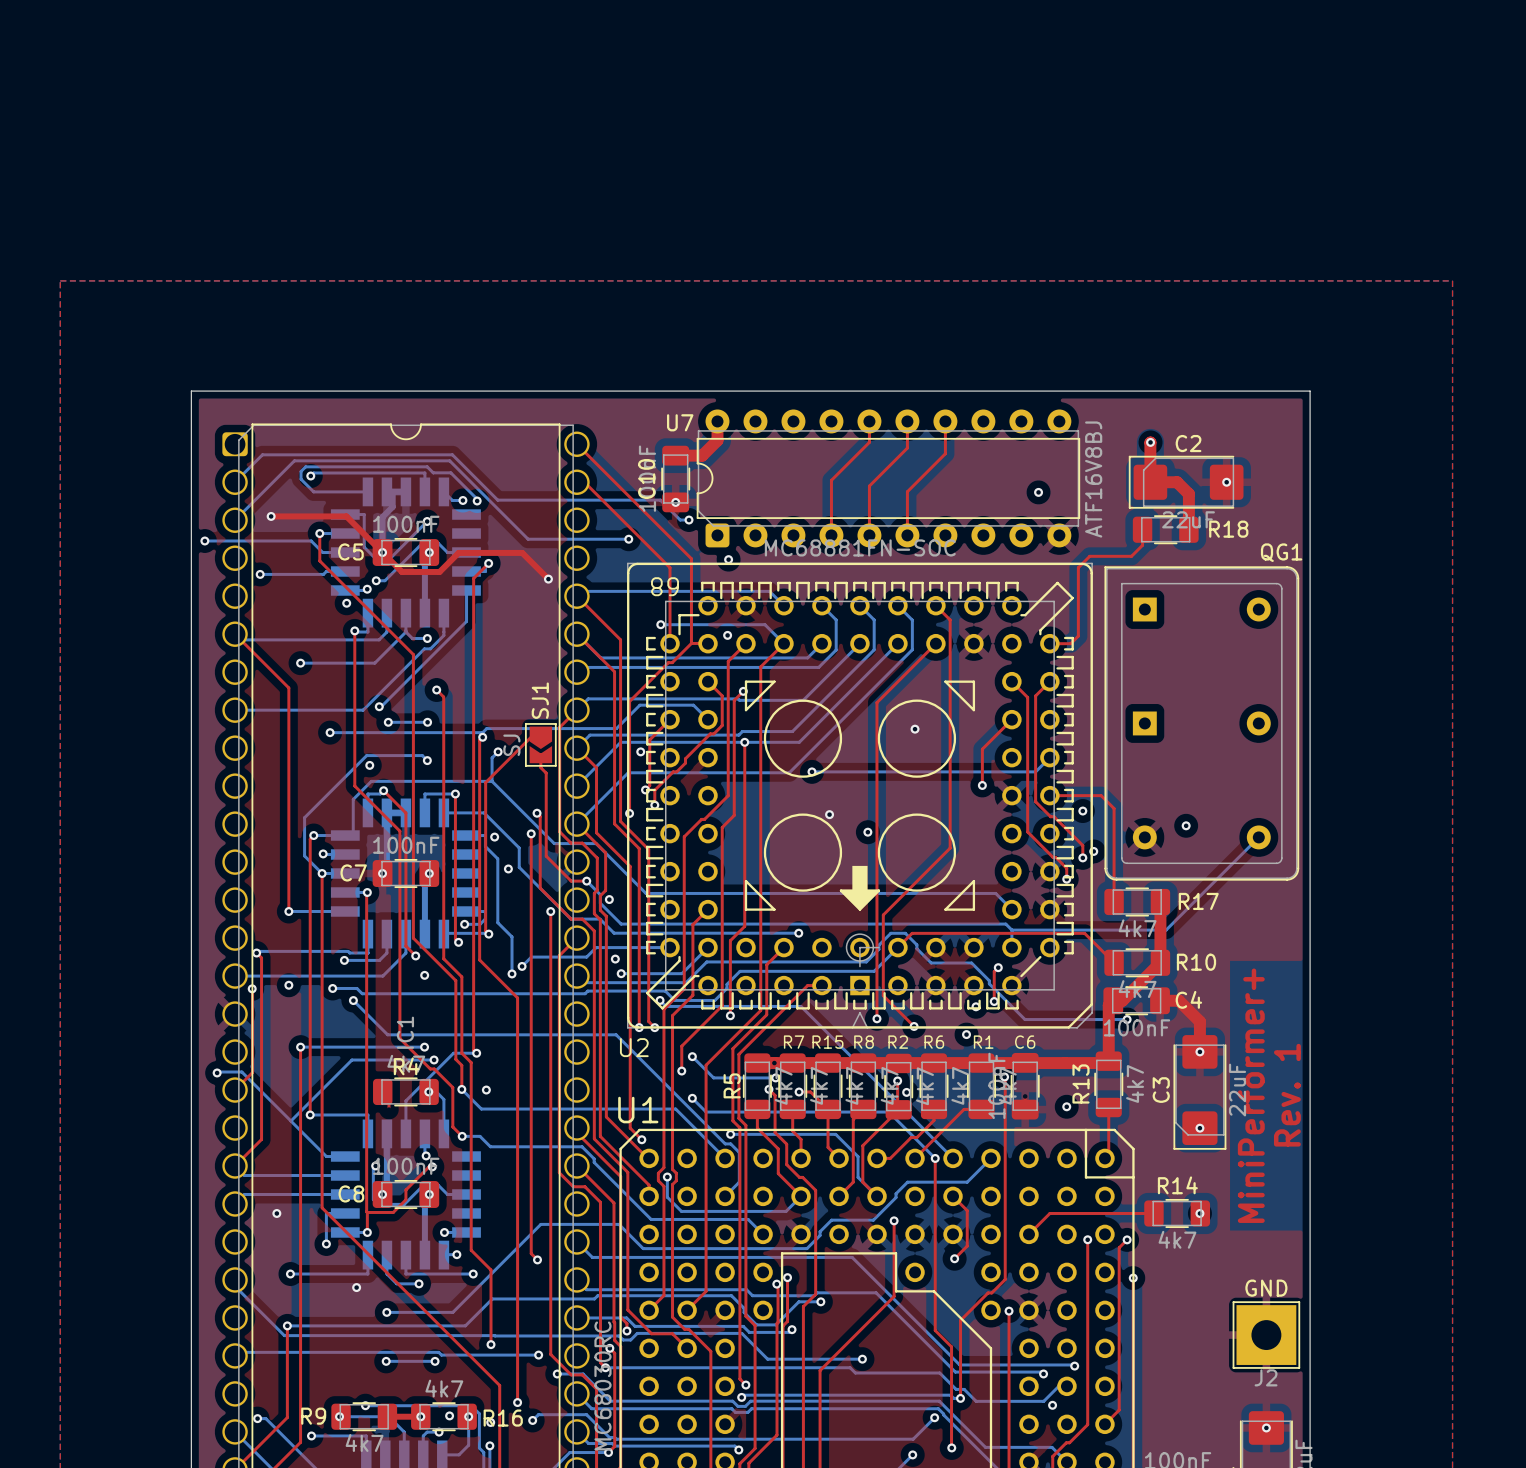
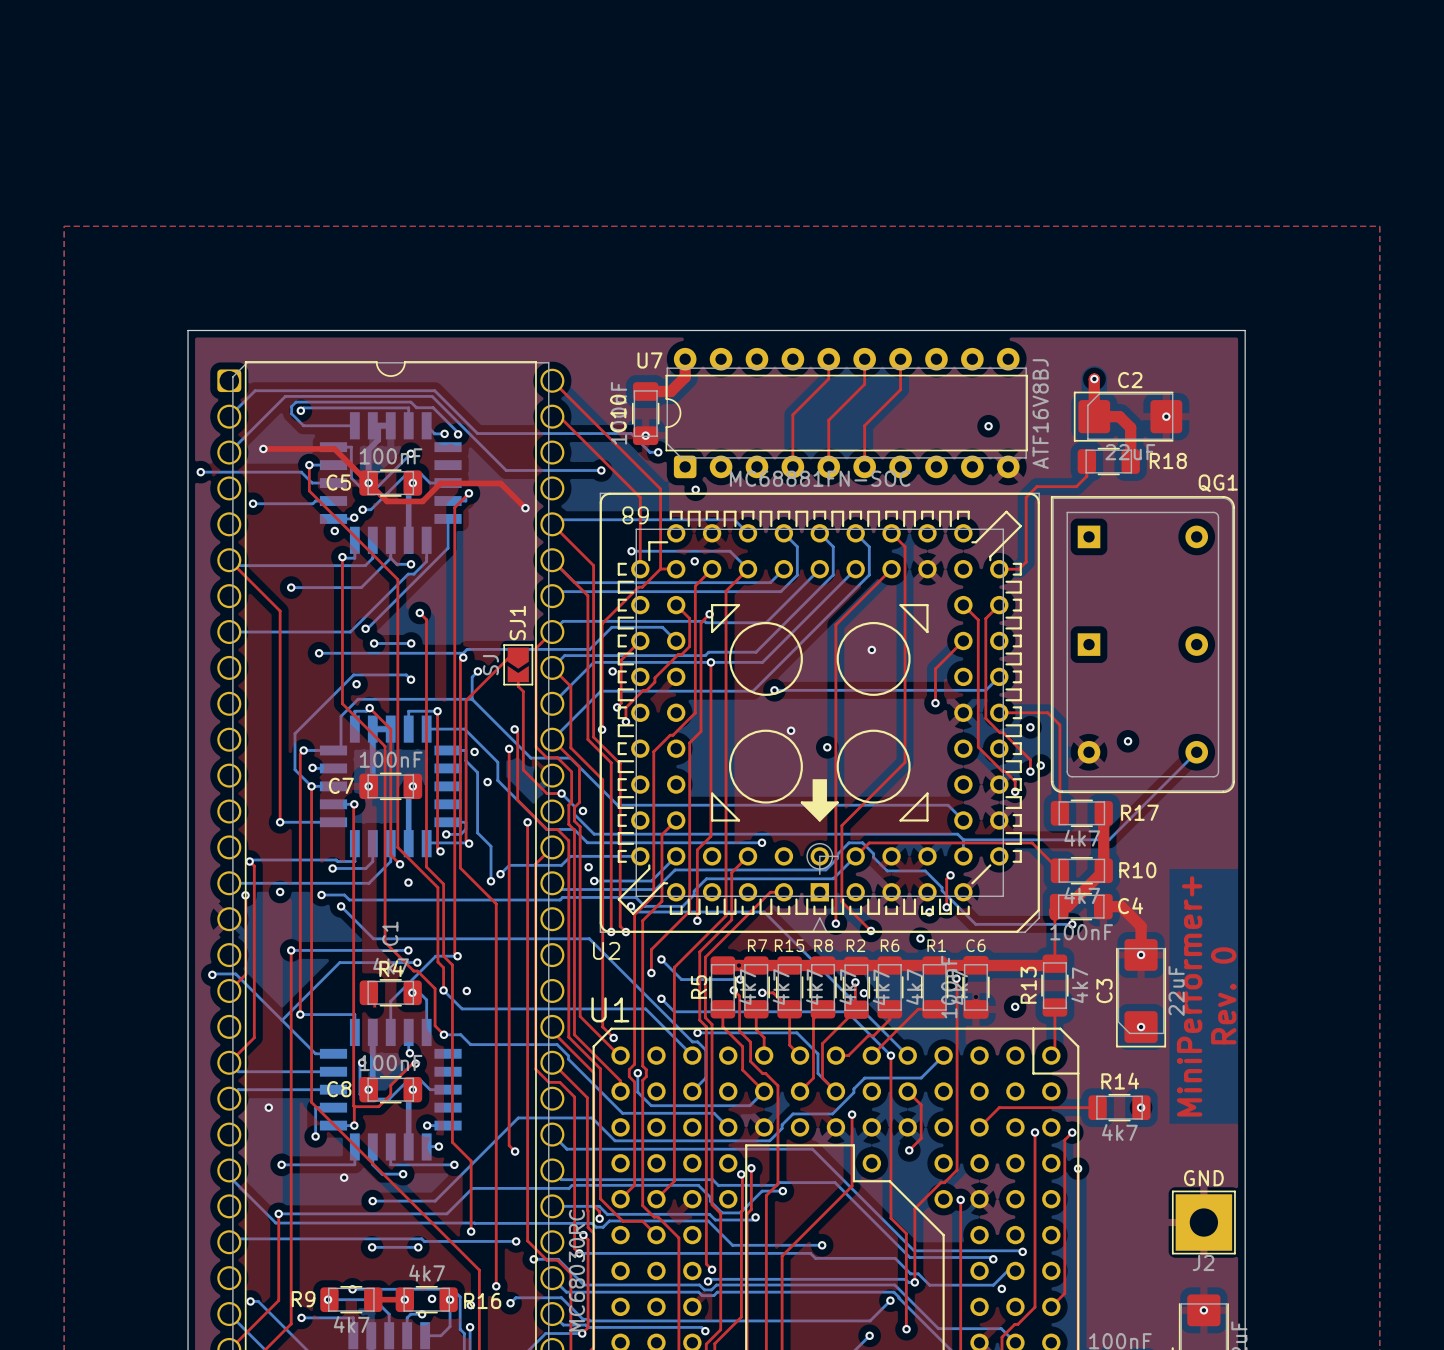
top track width: thick (1108, 1009) (1108, 1061) -> thin (1054, 915) (1054, 963)
text: Rev. 1 (1287, 1095) -> Rev. 0 (1223, 995)

